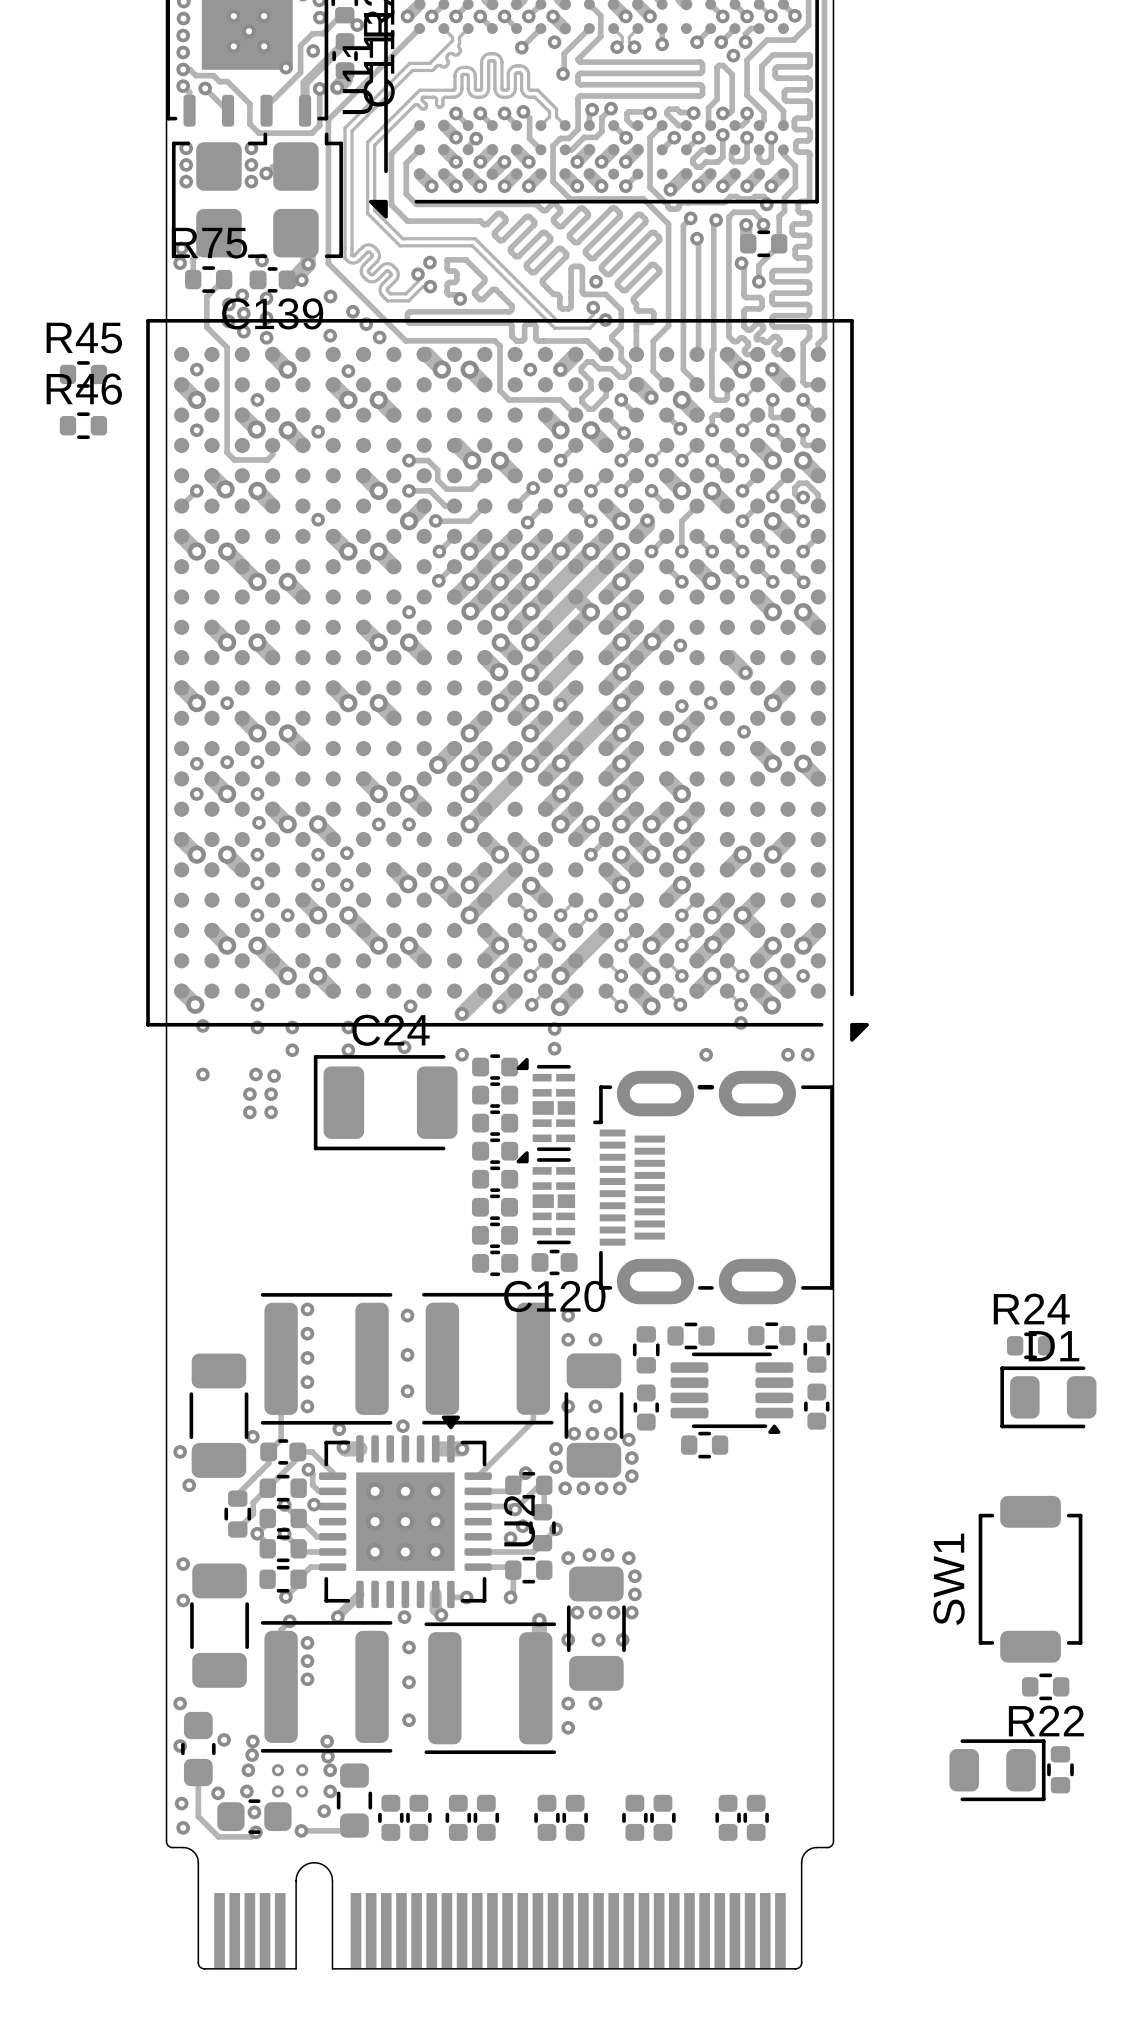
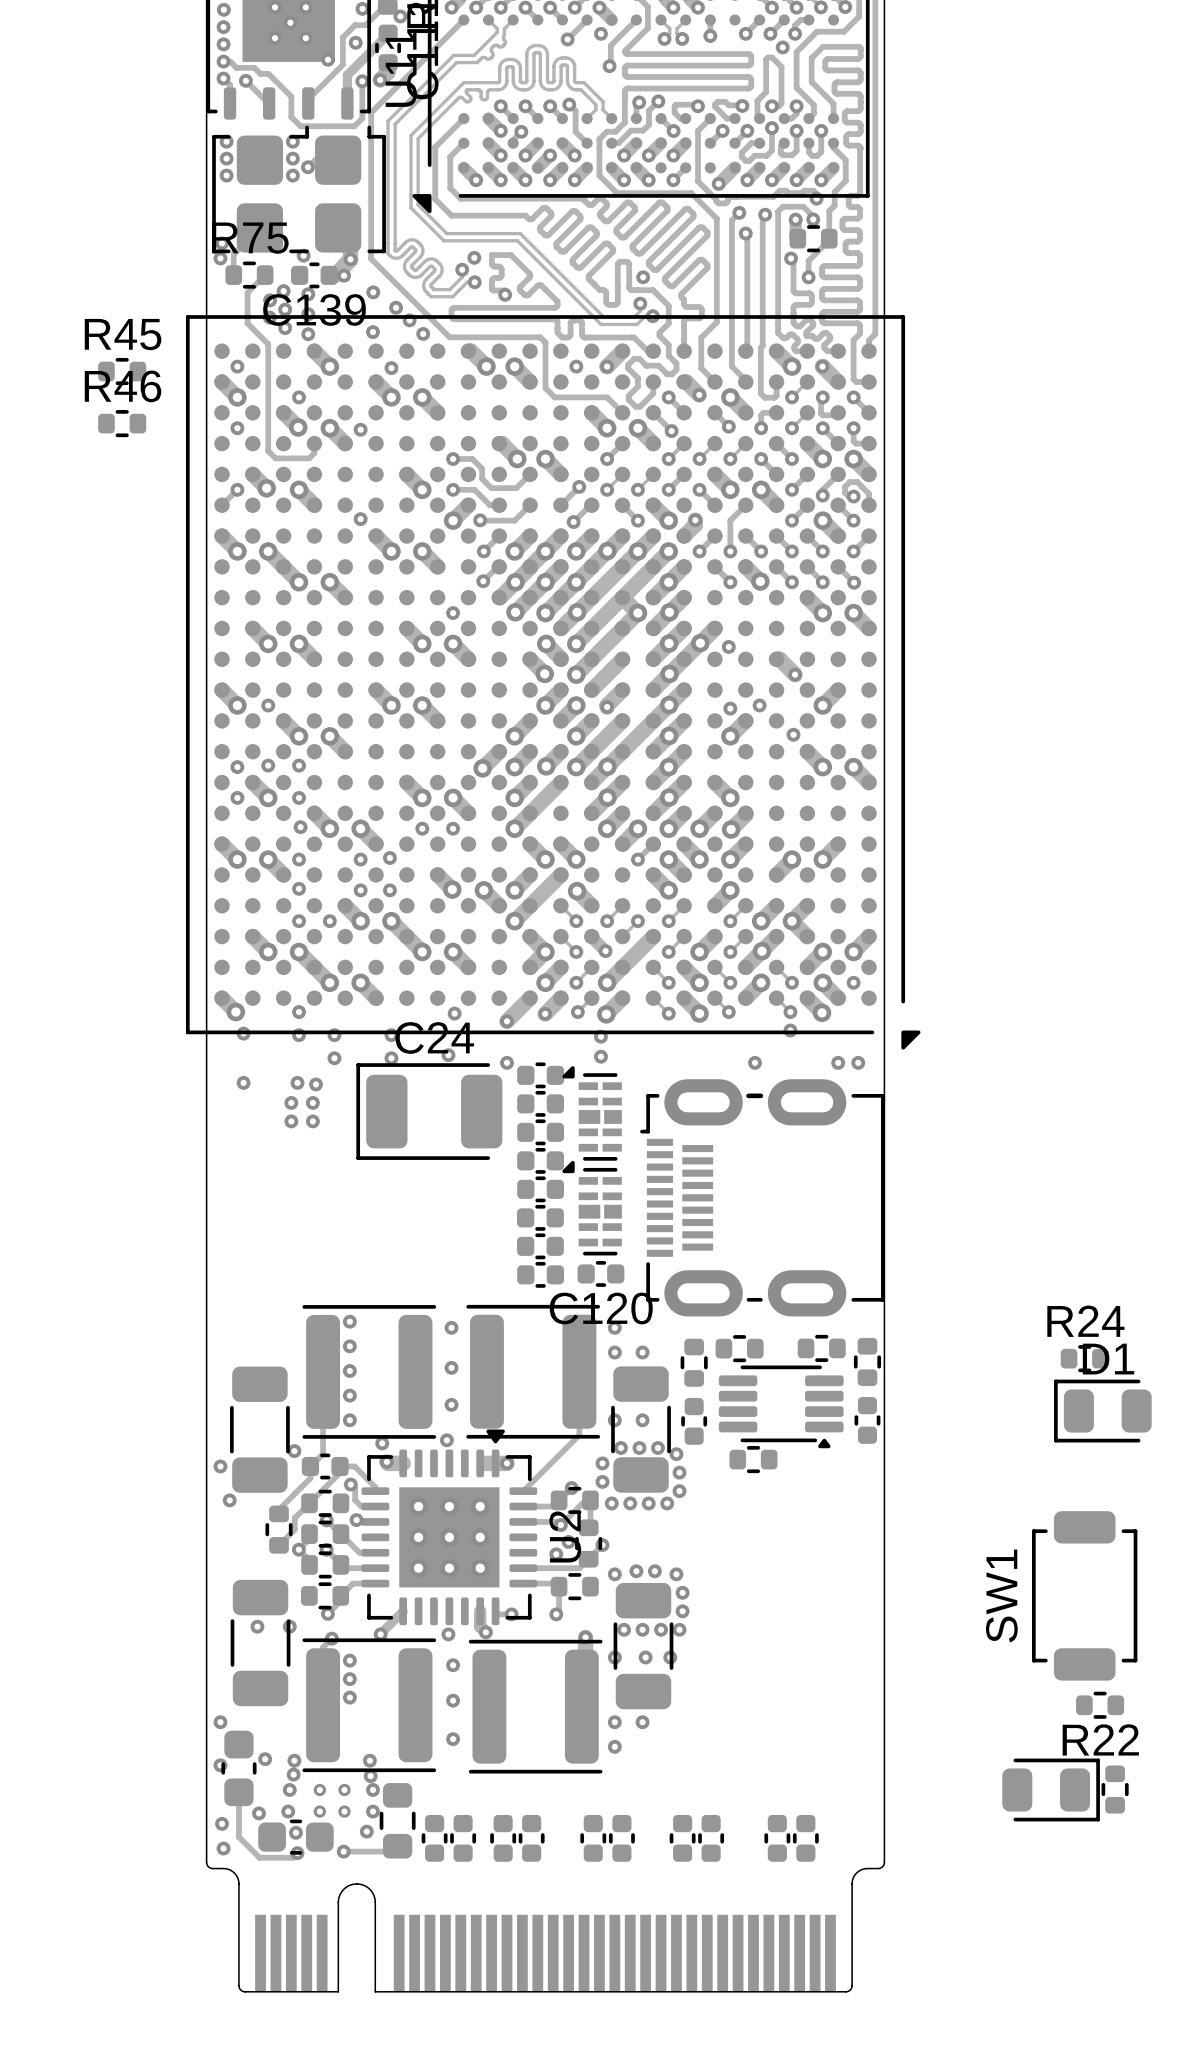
via: (183, 1564) -> none
via: (183, 1600) -> none
via: none -> (257, 1626)
via: none -> (289, 1626)

